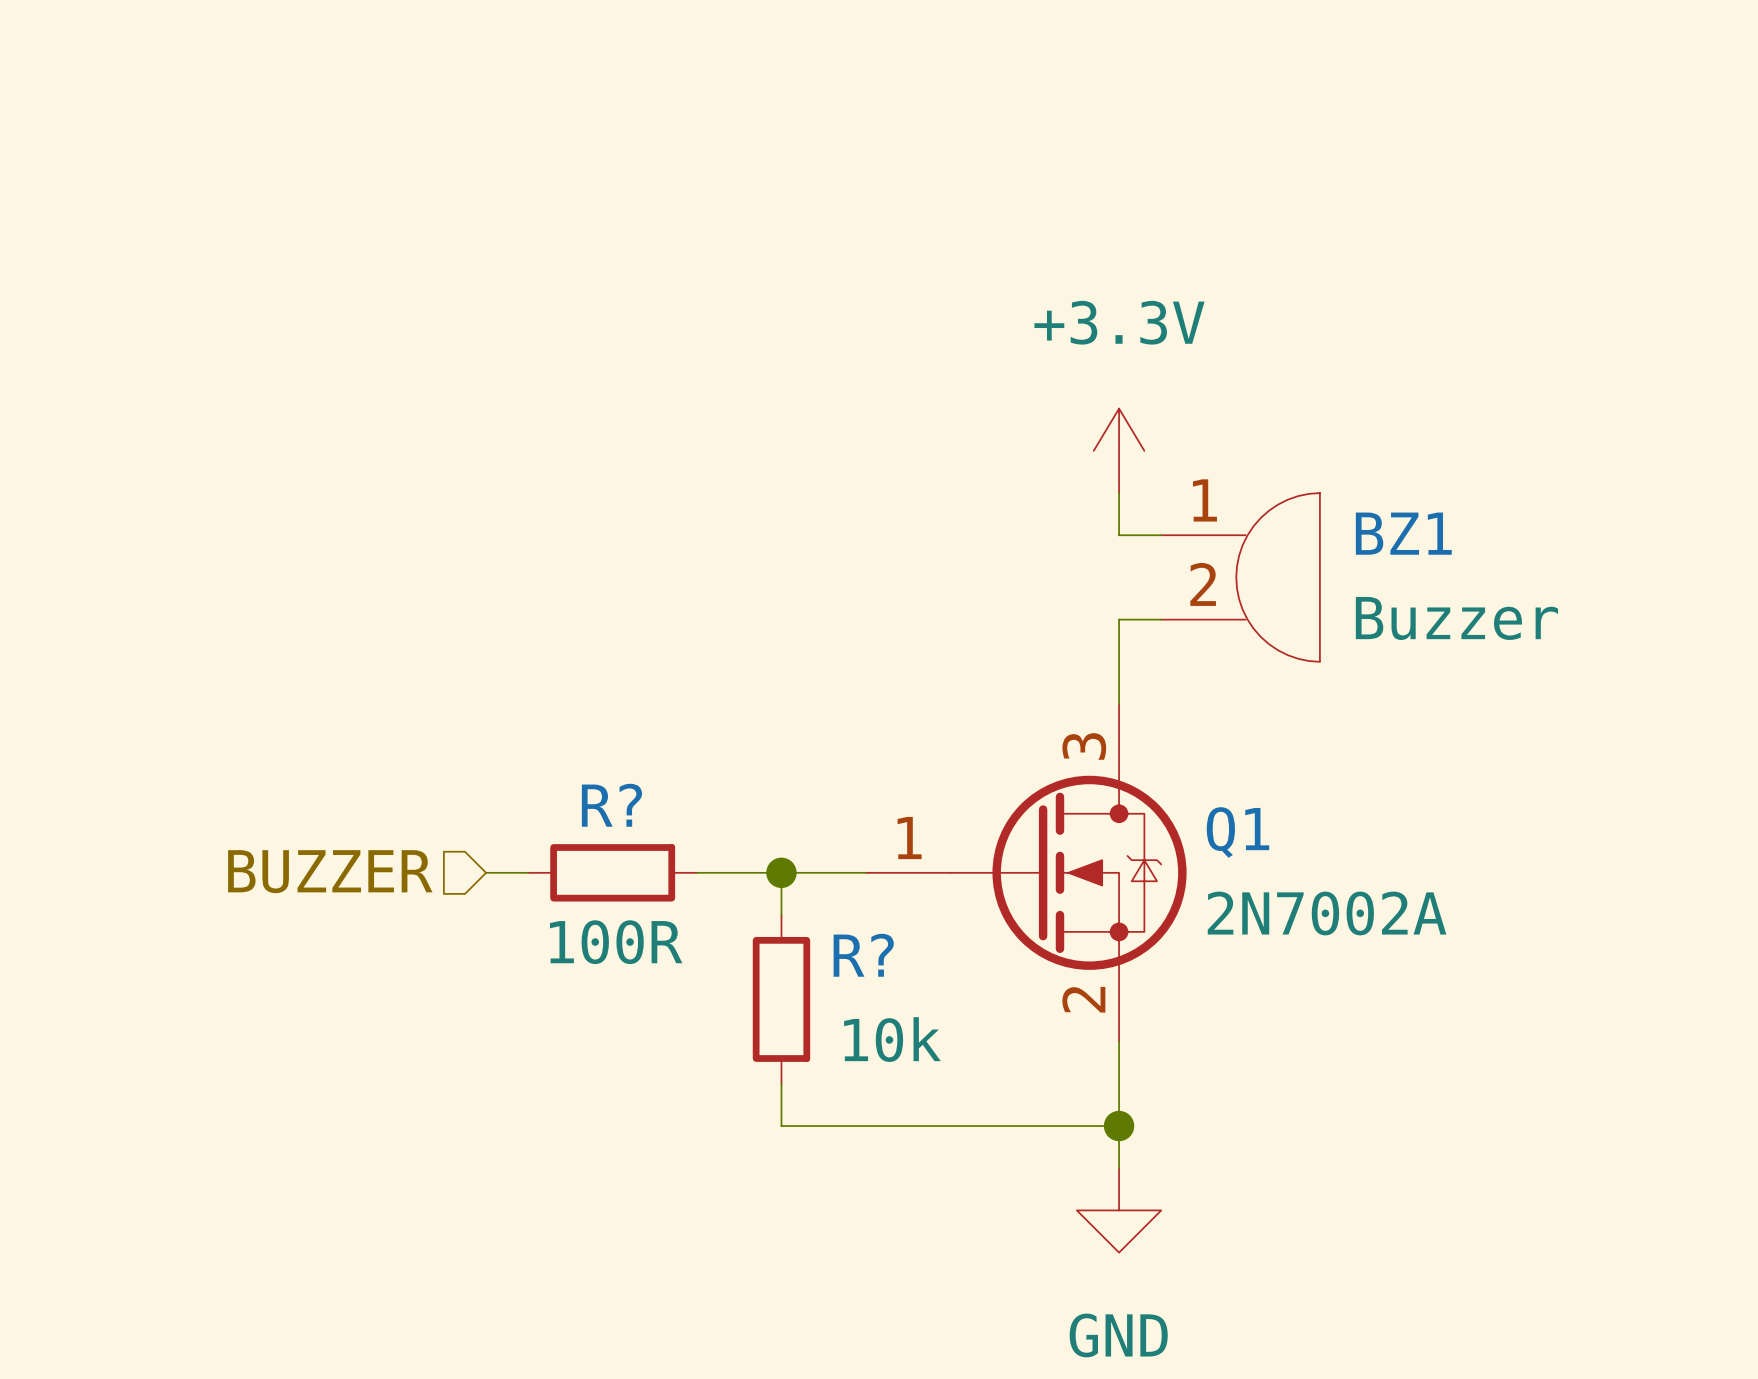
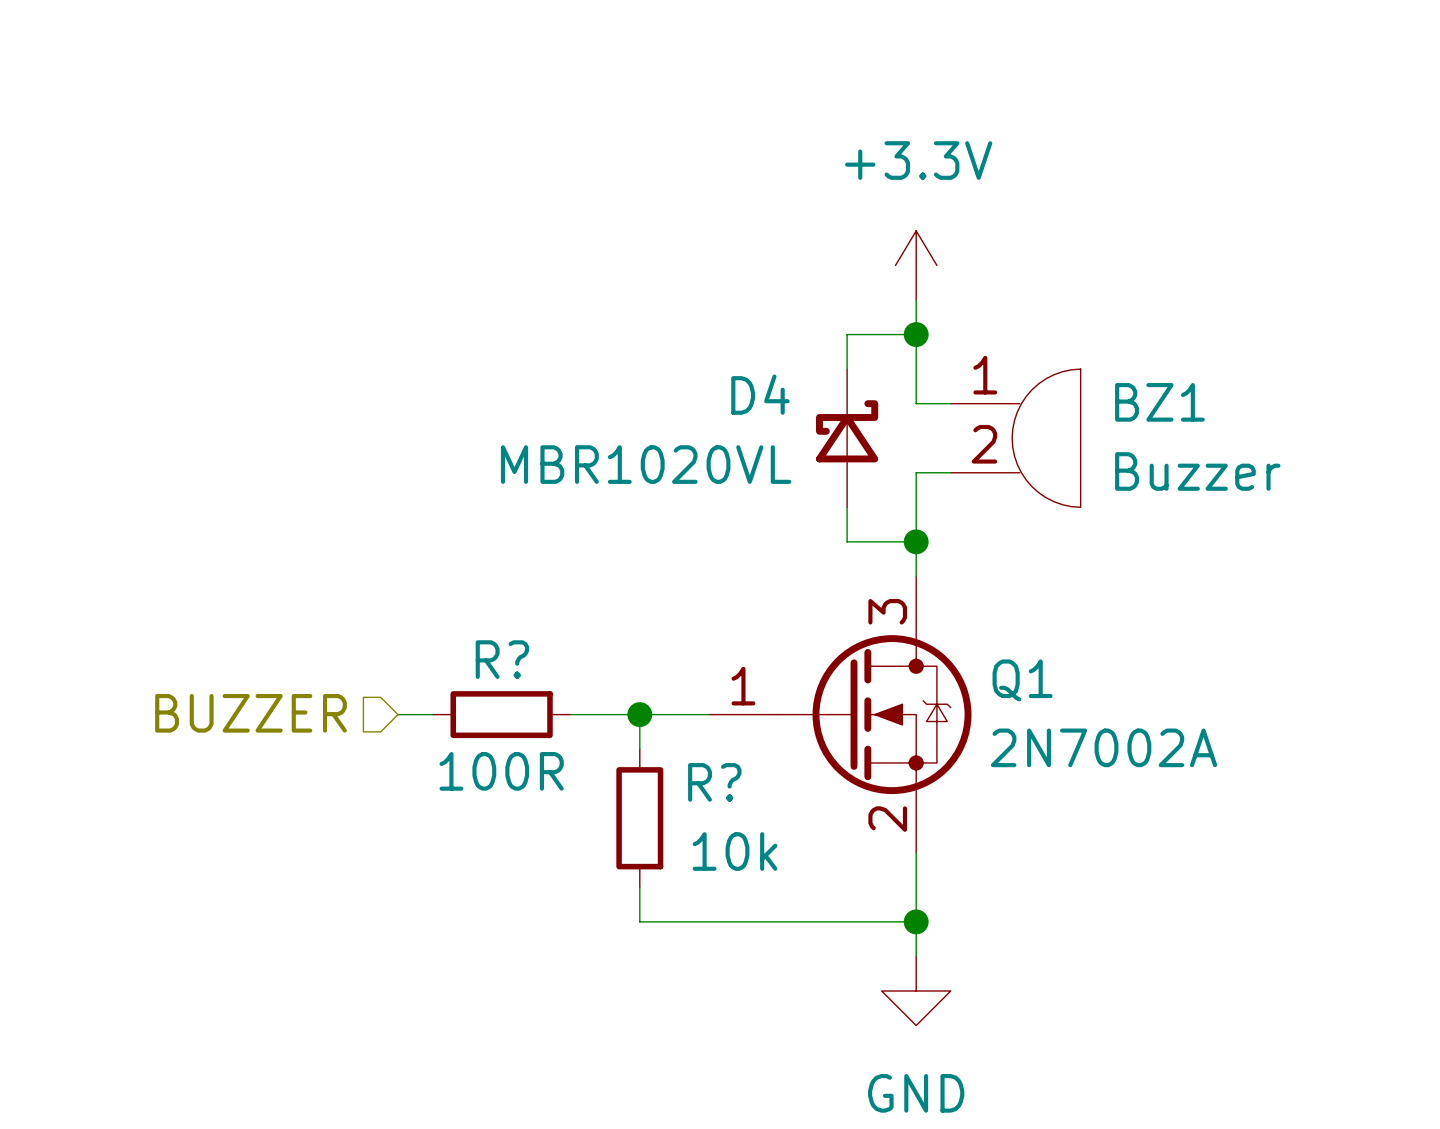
wire: none -> (916, 300) (916, 403) (950, 403)
wire: none -> (916, 334) (847, 334) (847, 369)
junction: none -> (916, 334)
power symbol position: +3.3V (1119, 450) -> +3.3V (916, 265)
wire: (1119, 493) (1119, 535) (1161, 535) -> none
D4: none -> MBR1020VL (847, 438)
BZ1 position: (1240, 577) -> (1015, 438)
wire: none -> (847, 507) (847, 541) (916, 541)
wire: (1119, 619) (1161, 619) -> (916, 507) (916, 472) (950, 472)
junction: none -> (916, 541)

